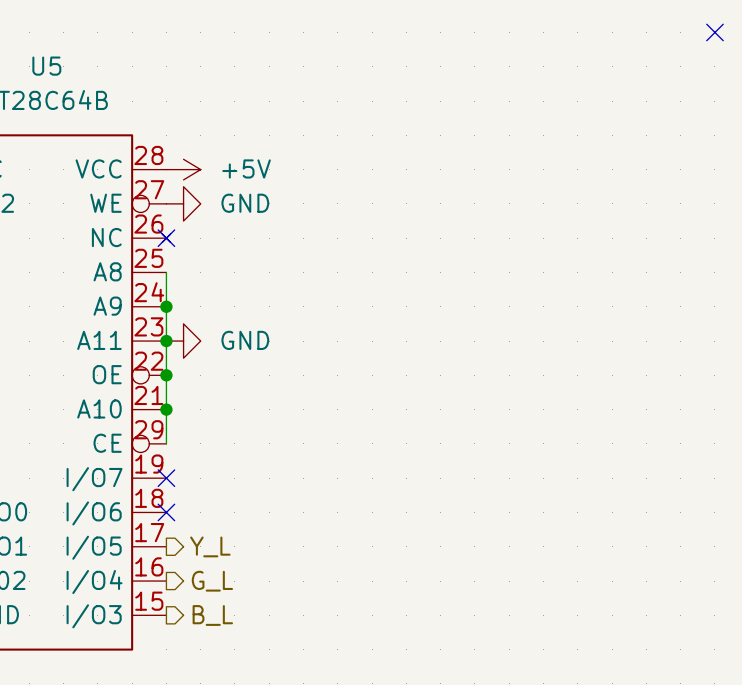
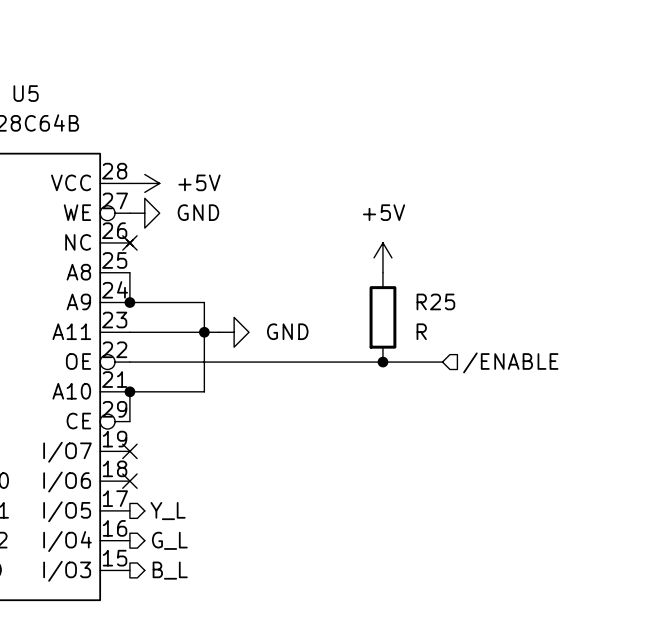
no-connect mark: (714, 32) -> none
power symbol: none -> +5V (382, 257)
wire: (166, 306) (166, 409) -> (129, 302) (204, 302) (204, 391) (129, 391)
R25: none -> R (382, 317)
wire: none -> (129, 332) (219, 332)
junction: (166, 341) -> none
power symbol position: GND (183, 341) -> GND (234, 332)
junction: none -> (204, 332)
wire: none -> (129, 362) (442, 362)
junction: (166, 375) -> none
junction: none -> (382, 362)
hierarchical label: none -> /ENABLE (510, 362)

